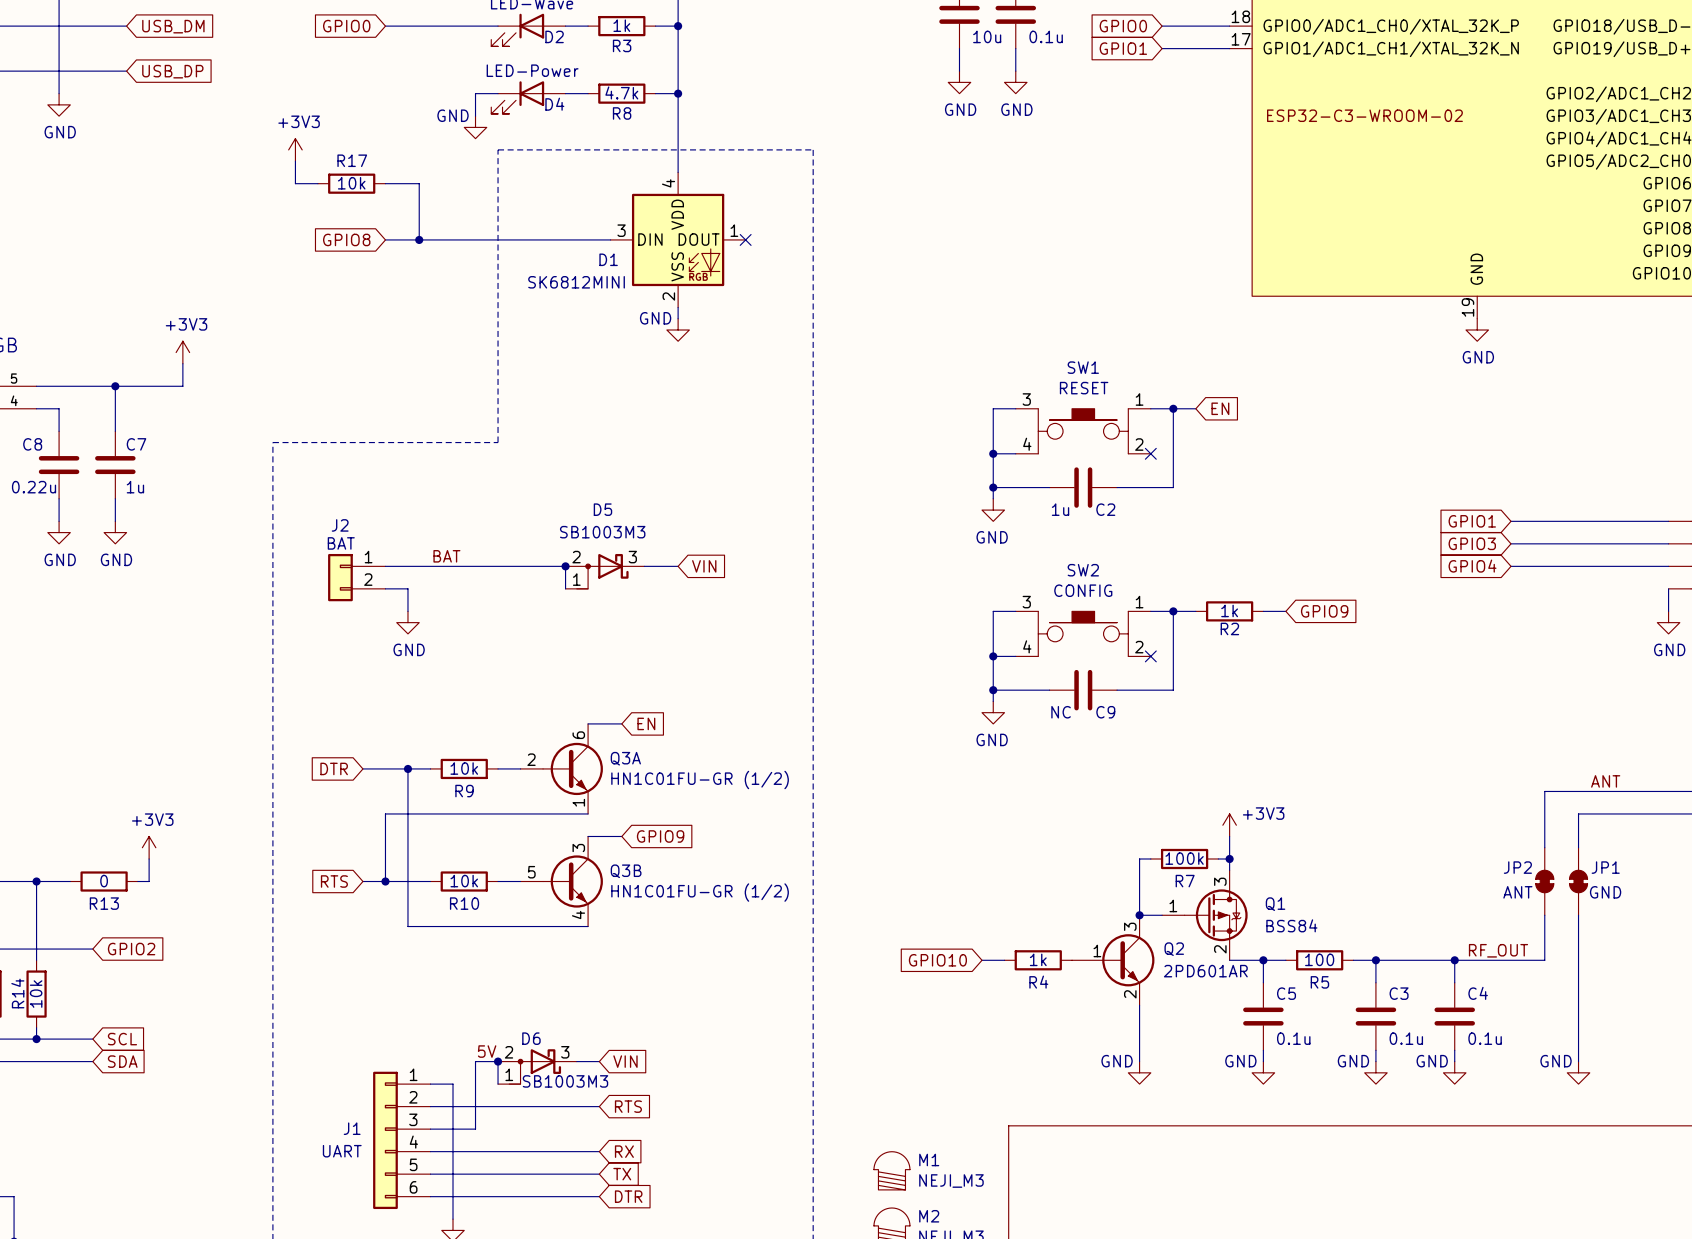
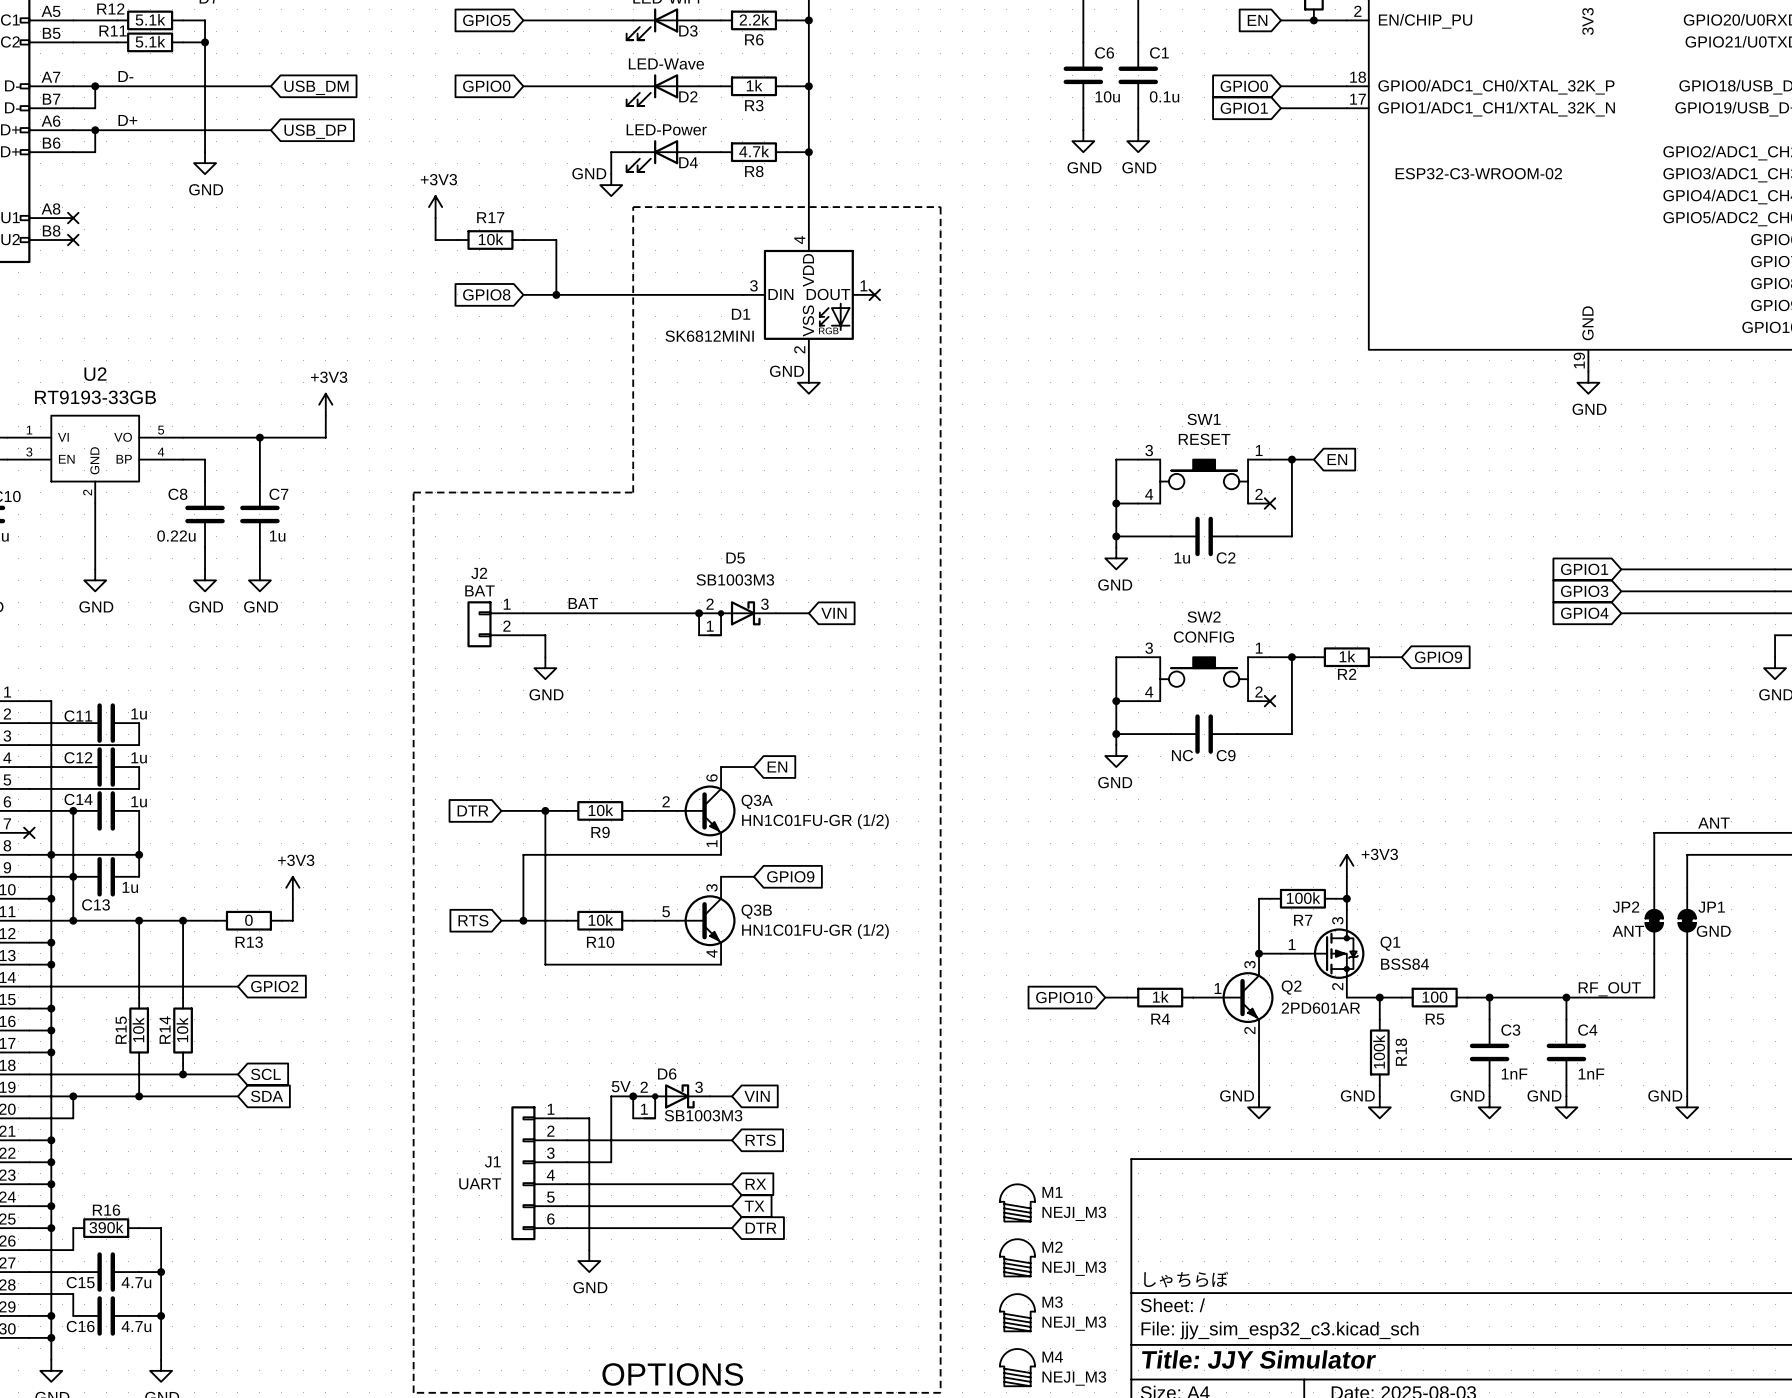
C5: 0.1u (1263, 1016) -> none
R18: none -> 100k (1379, 1052)
C3 value: 0.1u (1406, 1038) -> 1nF (1514, 1074)
C4 value: 0.1u (1485, 1038) -> 1nF (1591, 1074)

